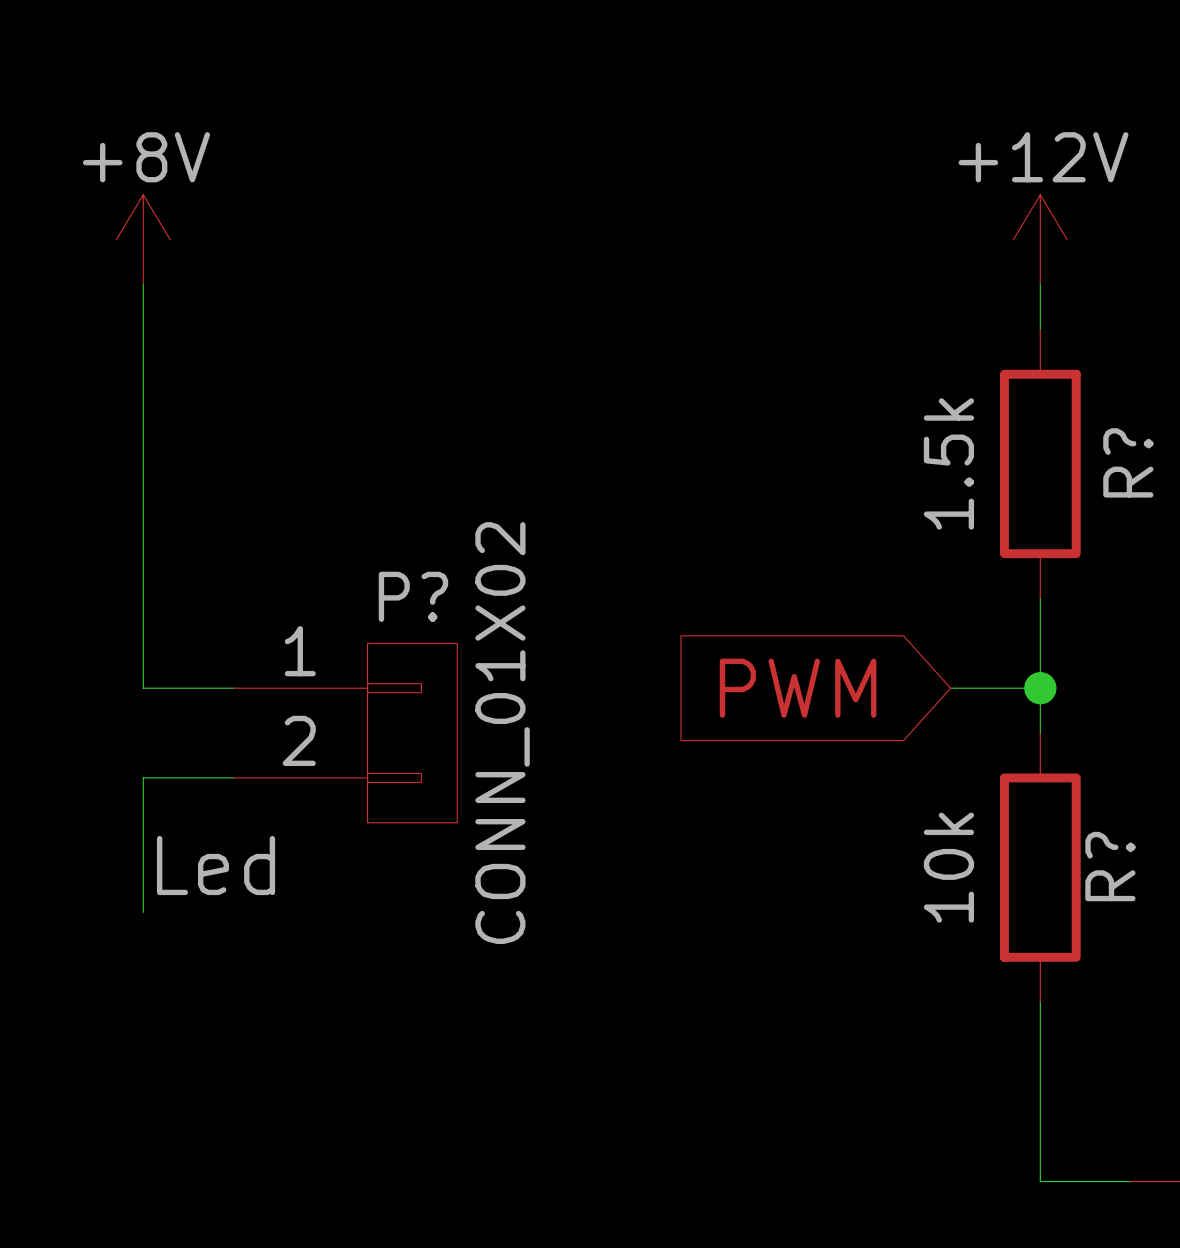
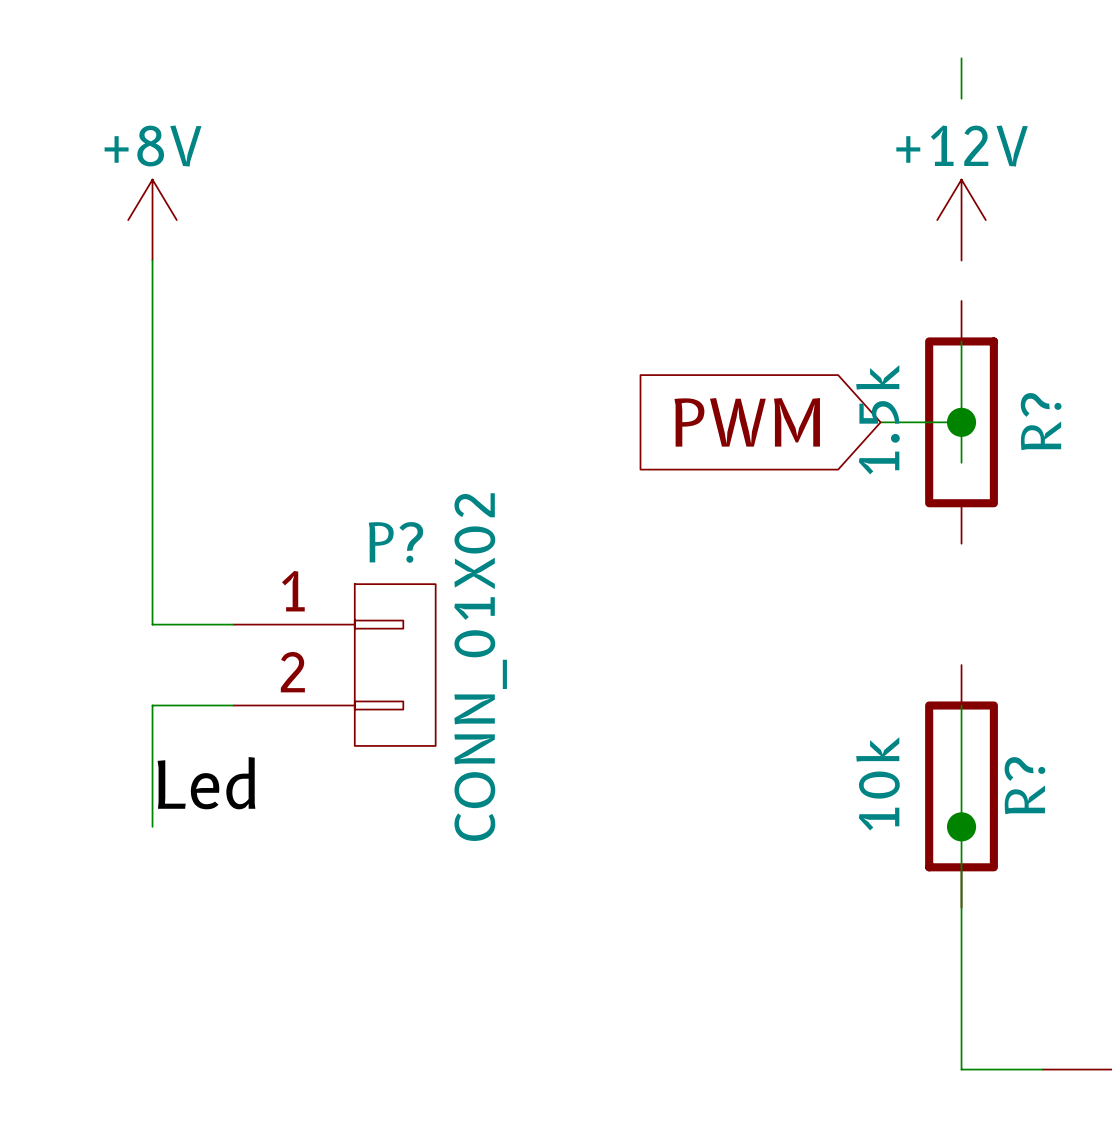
wire: (1040, 284) (1040, 329) -> (961, 58) (961, 98)
junction: none -> (961, 422)
wire: (1040, 598) (1040, 733) -> (961, 341) (961, 462)
global label position: PWM (798, 688) -> PWM (747, 422)
wire: (950, 688) (1040, 688) -> (880, 422) (961, 422)
junction: (1040, 688) -> none
wire: none -> (961, 705) (961, 907)
junction: none -> (961, 826)

